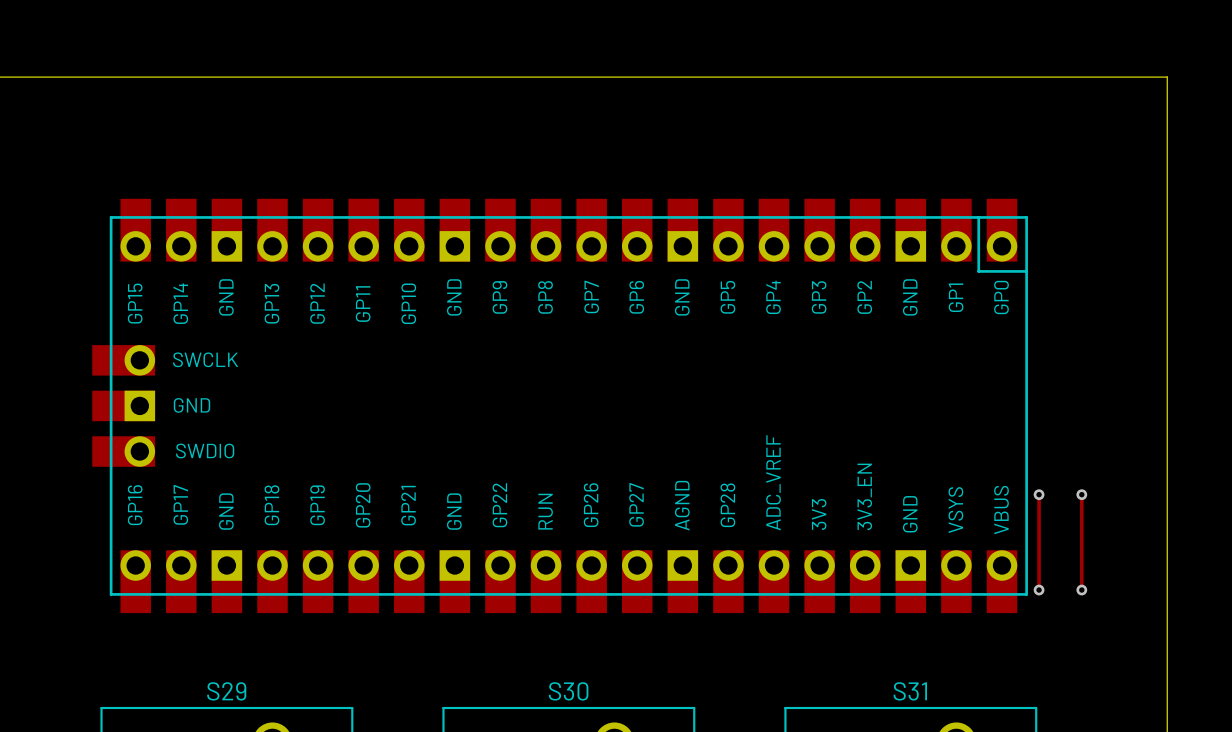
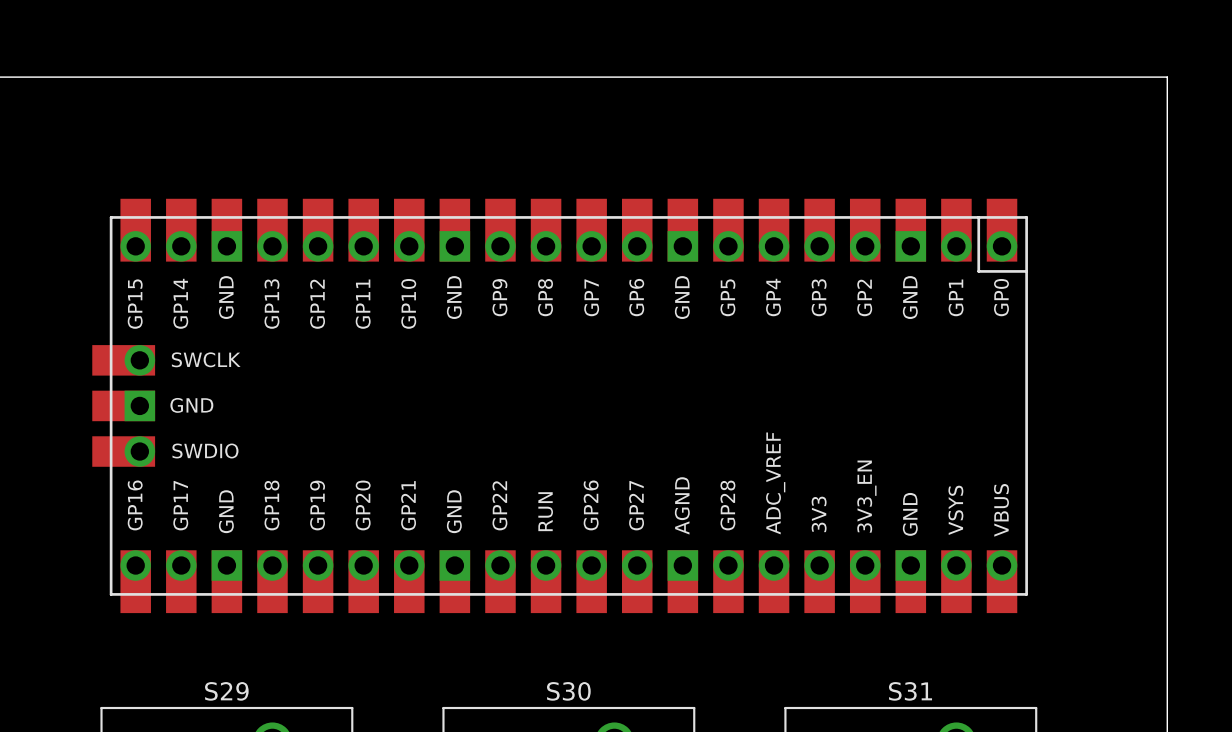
track: (1039, 494) (1039, 590) -> none
via: (1039, 494) -> none
track: (1081, 494) (1081, 590) -> none
via: (1081, 494) -> none
via: (1039, 590) -> none
via: (1081, 590) -> none

